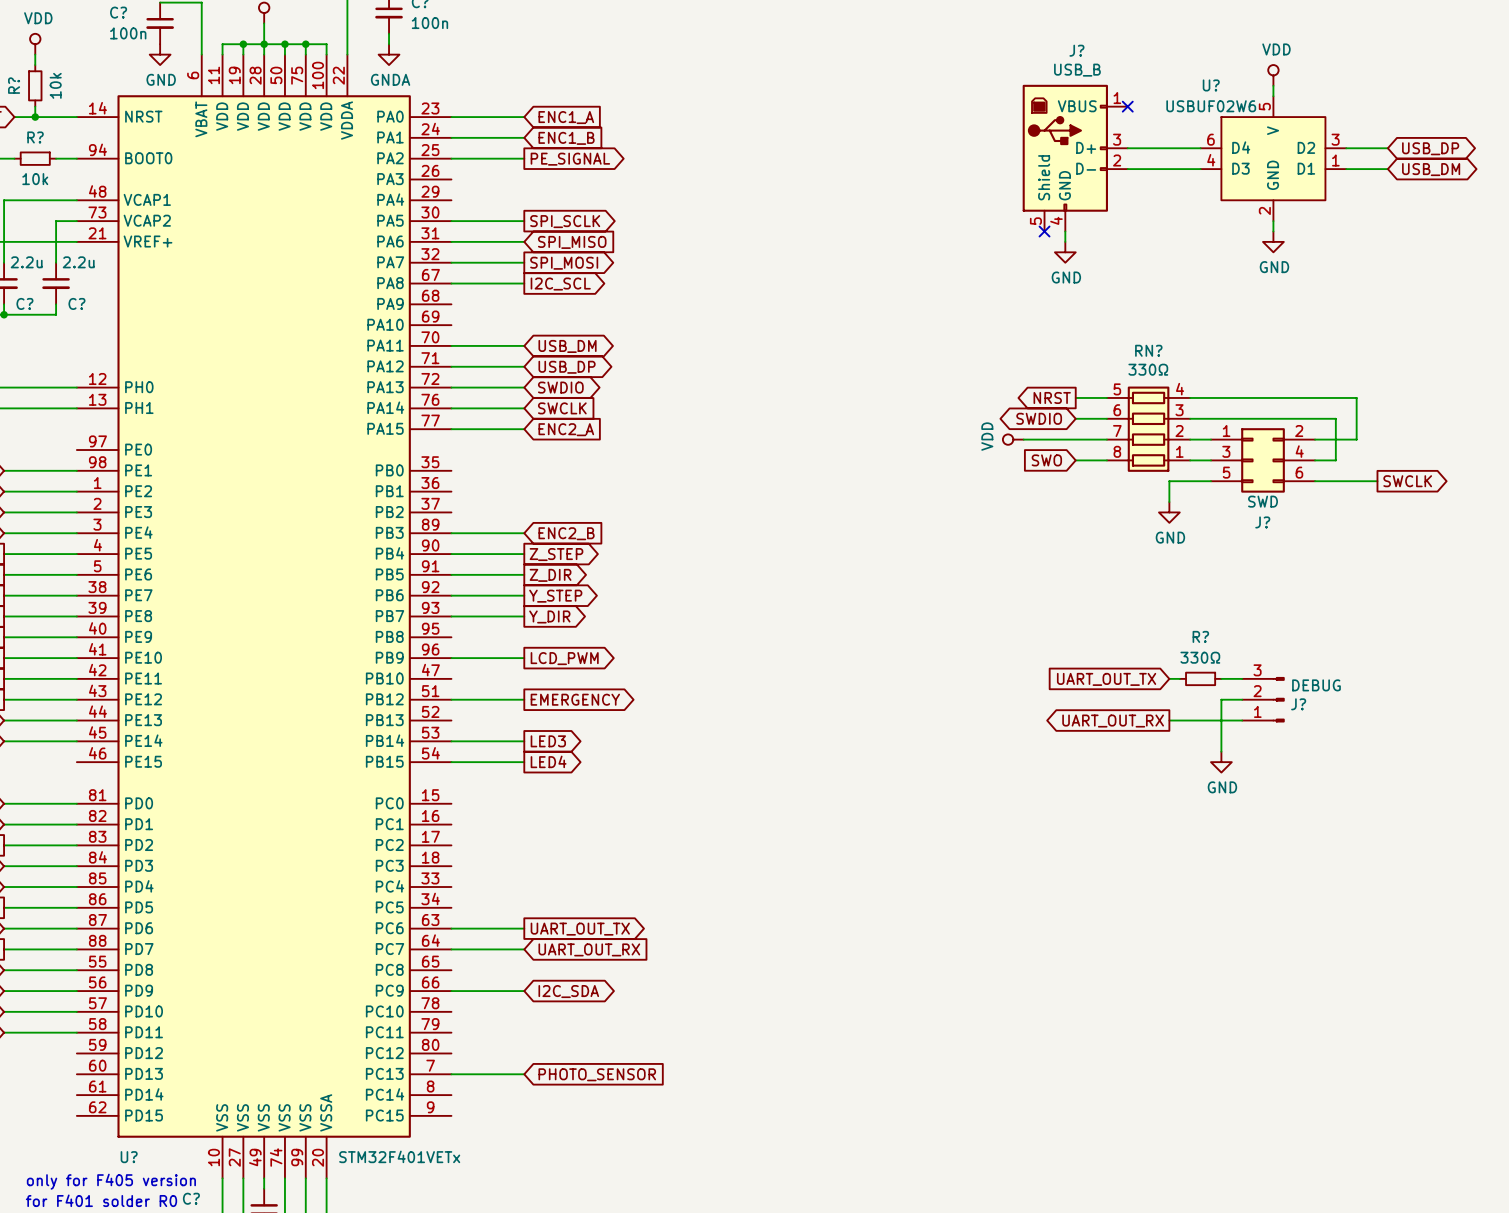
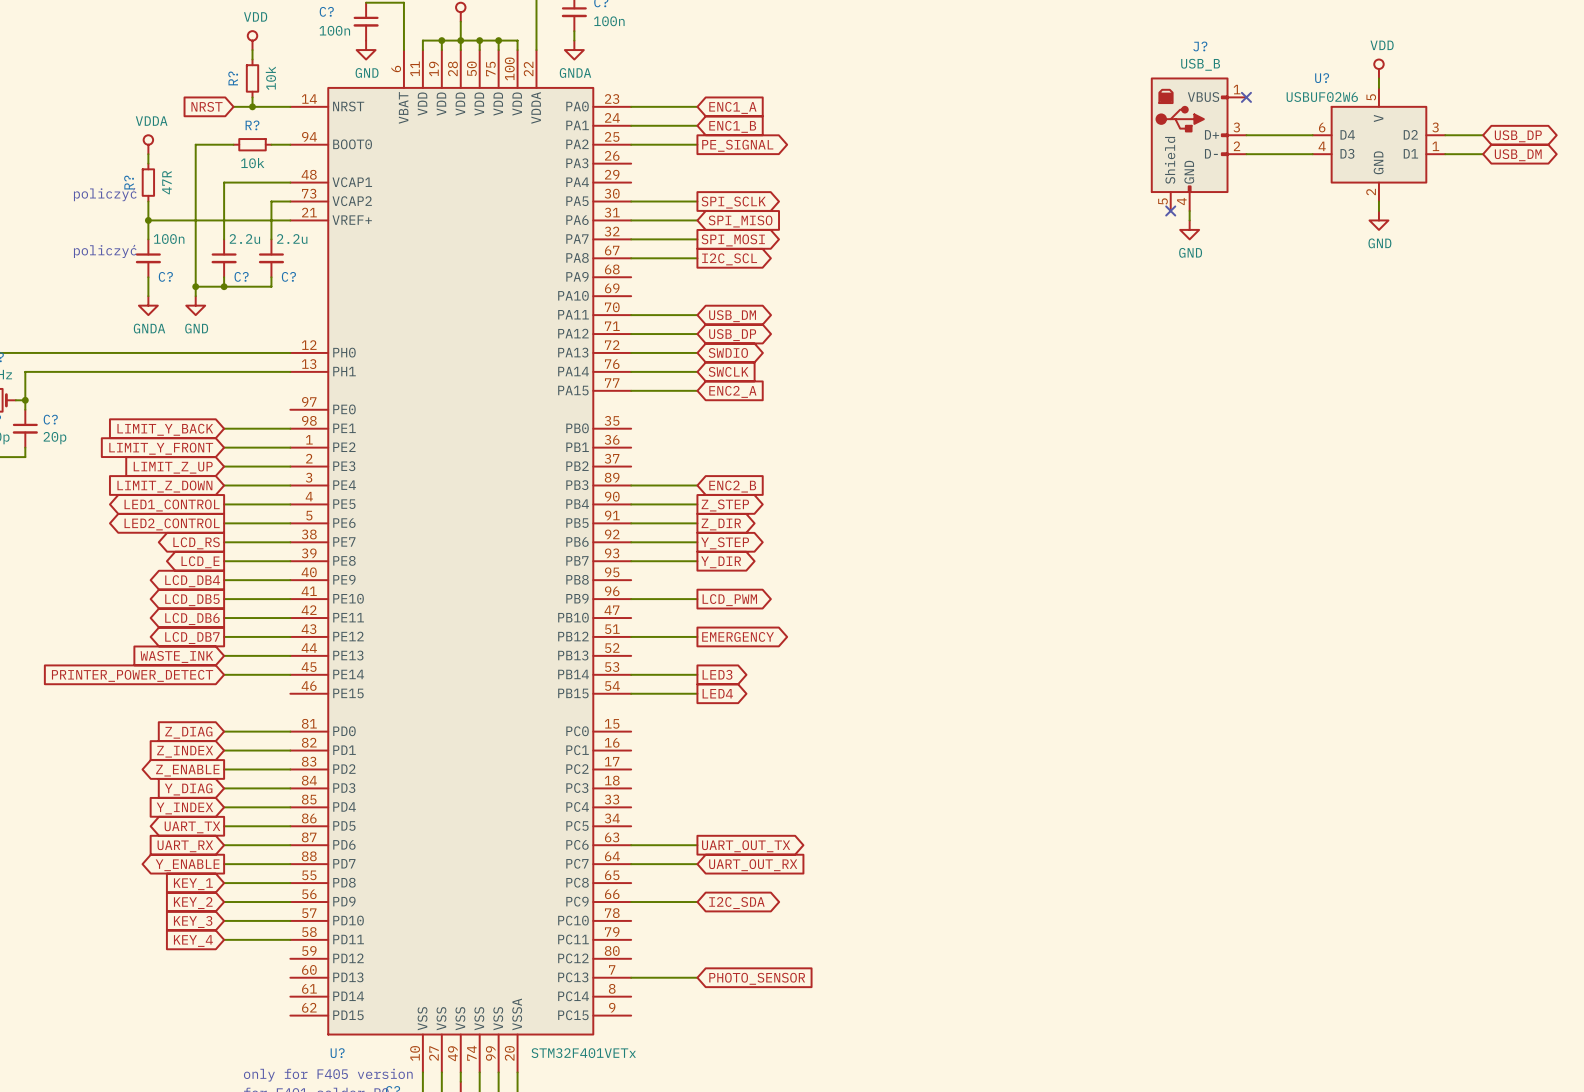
global label: NRST (1052, 397) -> none
wire: (1075, 397) (1106, 397) -> none
wire: (1190, 397) (1356, 397) (1356, 439) (1315, 439) -> none
global label: SWDIO (1039, 418) -> none
wire: (1075, 418) (1106, 418) -> none
wire: (1190, 418) (1335, 418) (1335, 460) (1315, 460) -> none
RN?: 330Ω (1148, 429) -> none
power symbol: VDD (1013, 439) -> none
wire: (1023, 439) (1106, 439) -> none
wire: (1190, 439) (1210, 439) -> none
global label: SWO (1046, 460) -> none
wire: (1075, 460) (1106, 460) -> none
wire: (1190, 460) (1210, 460) -> none
J?: SWD (1263, 460) -> none
wire: (1210, 481) (1169, 481) (1169, 502) -> none
wire: (1315, 481) (1377, 481) -> none
global label: SWCLK (1407, 481) -> none
power symbol: GND (1169, 512) -> none
wire: (1169, 678) (1179, 678) -> none
R?: 330Ω (1200, 678) -> none
wire: (1221, 678) (1242, 678) -> none
global label: UART_OUT_TX (1106, 679) -> none
wire: (1242, 699) (1221, 699) (1221, 751) -> none
J?: DEBUG (1263, 699) -> none
wire: (1169, 720) (1242, 720) -> none
global label: UART_OUT_RX (1113, 721) -> none
power symbol: GND (1221, 762) -> none

